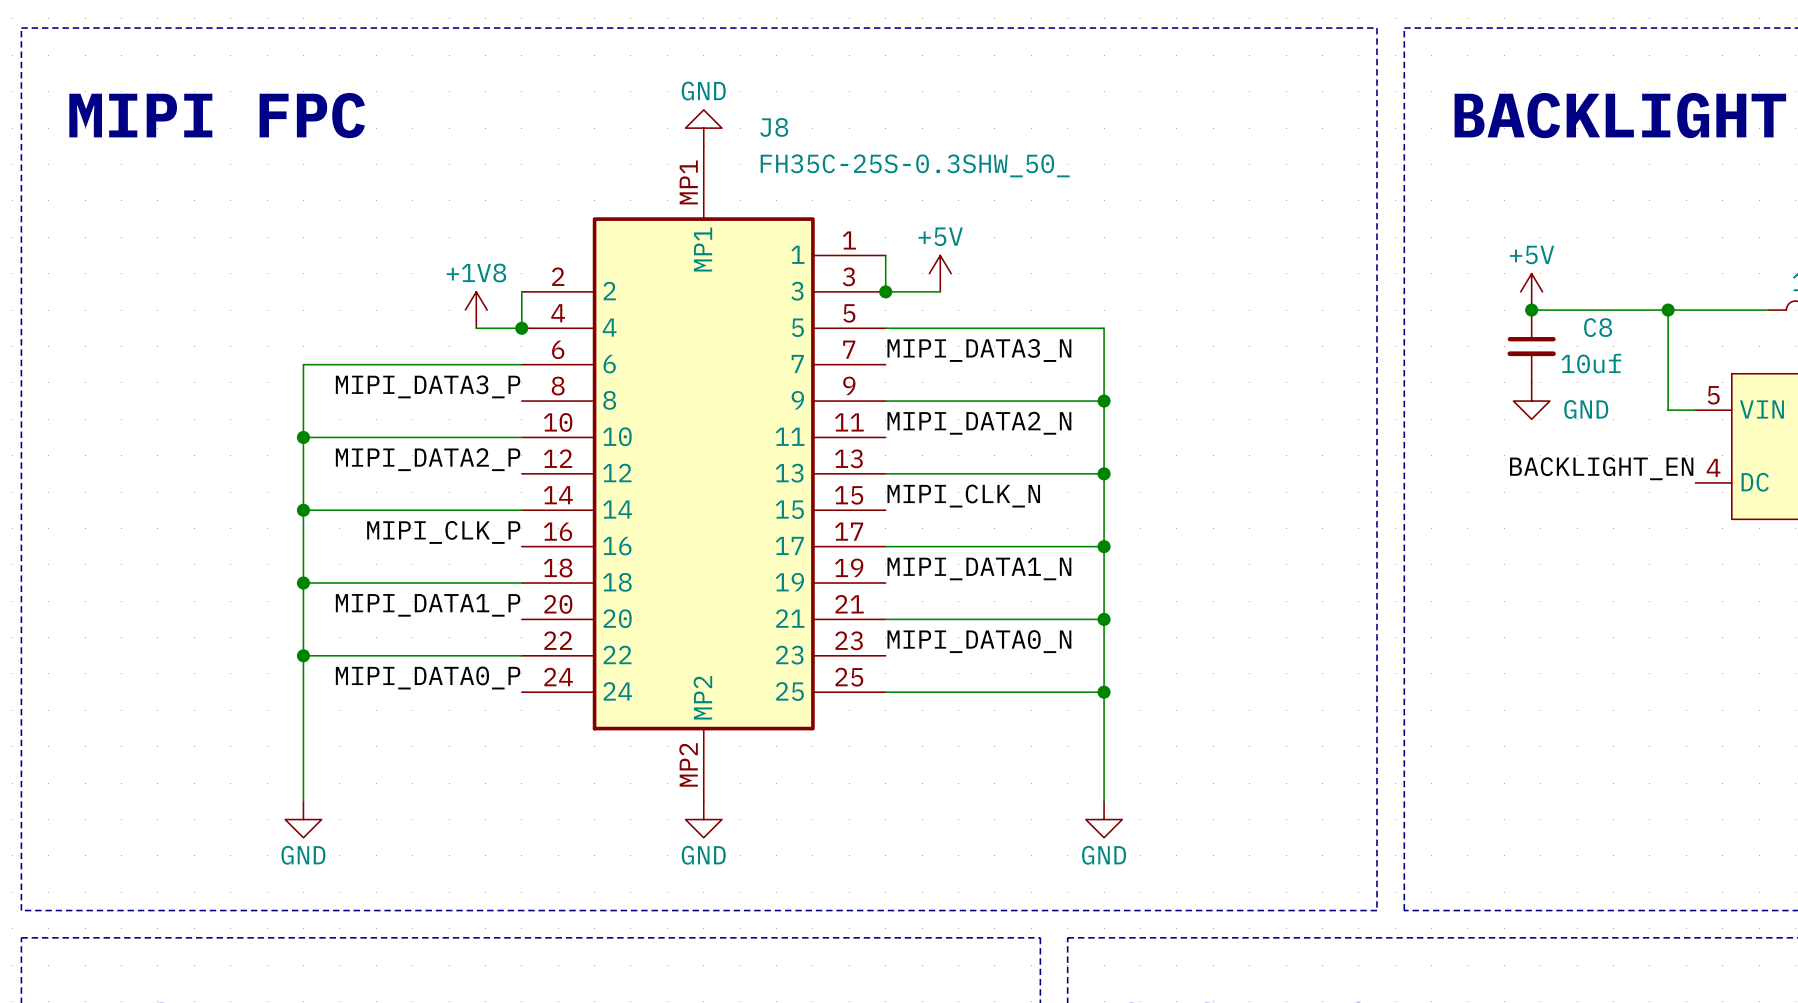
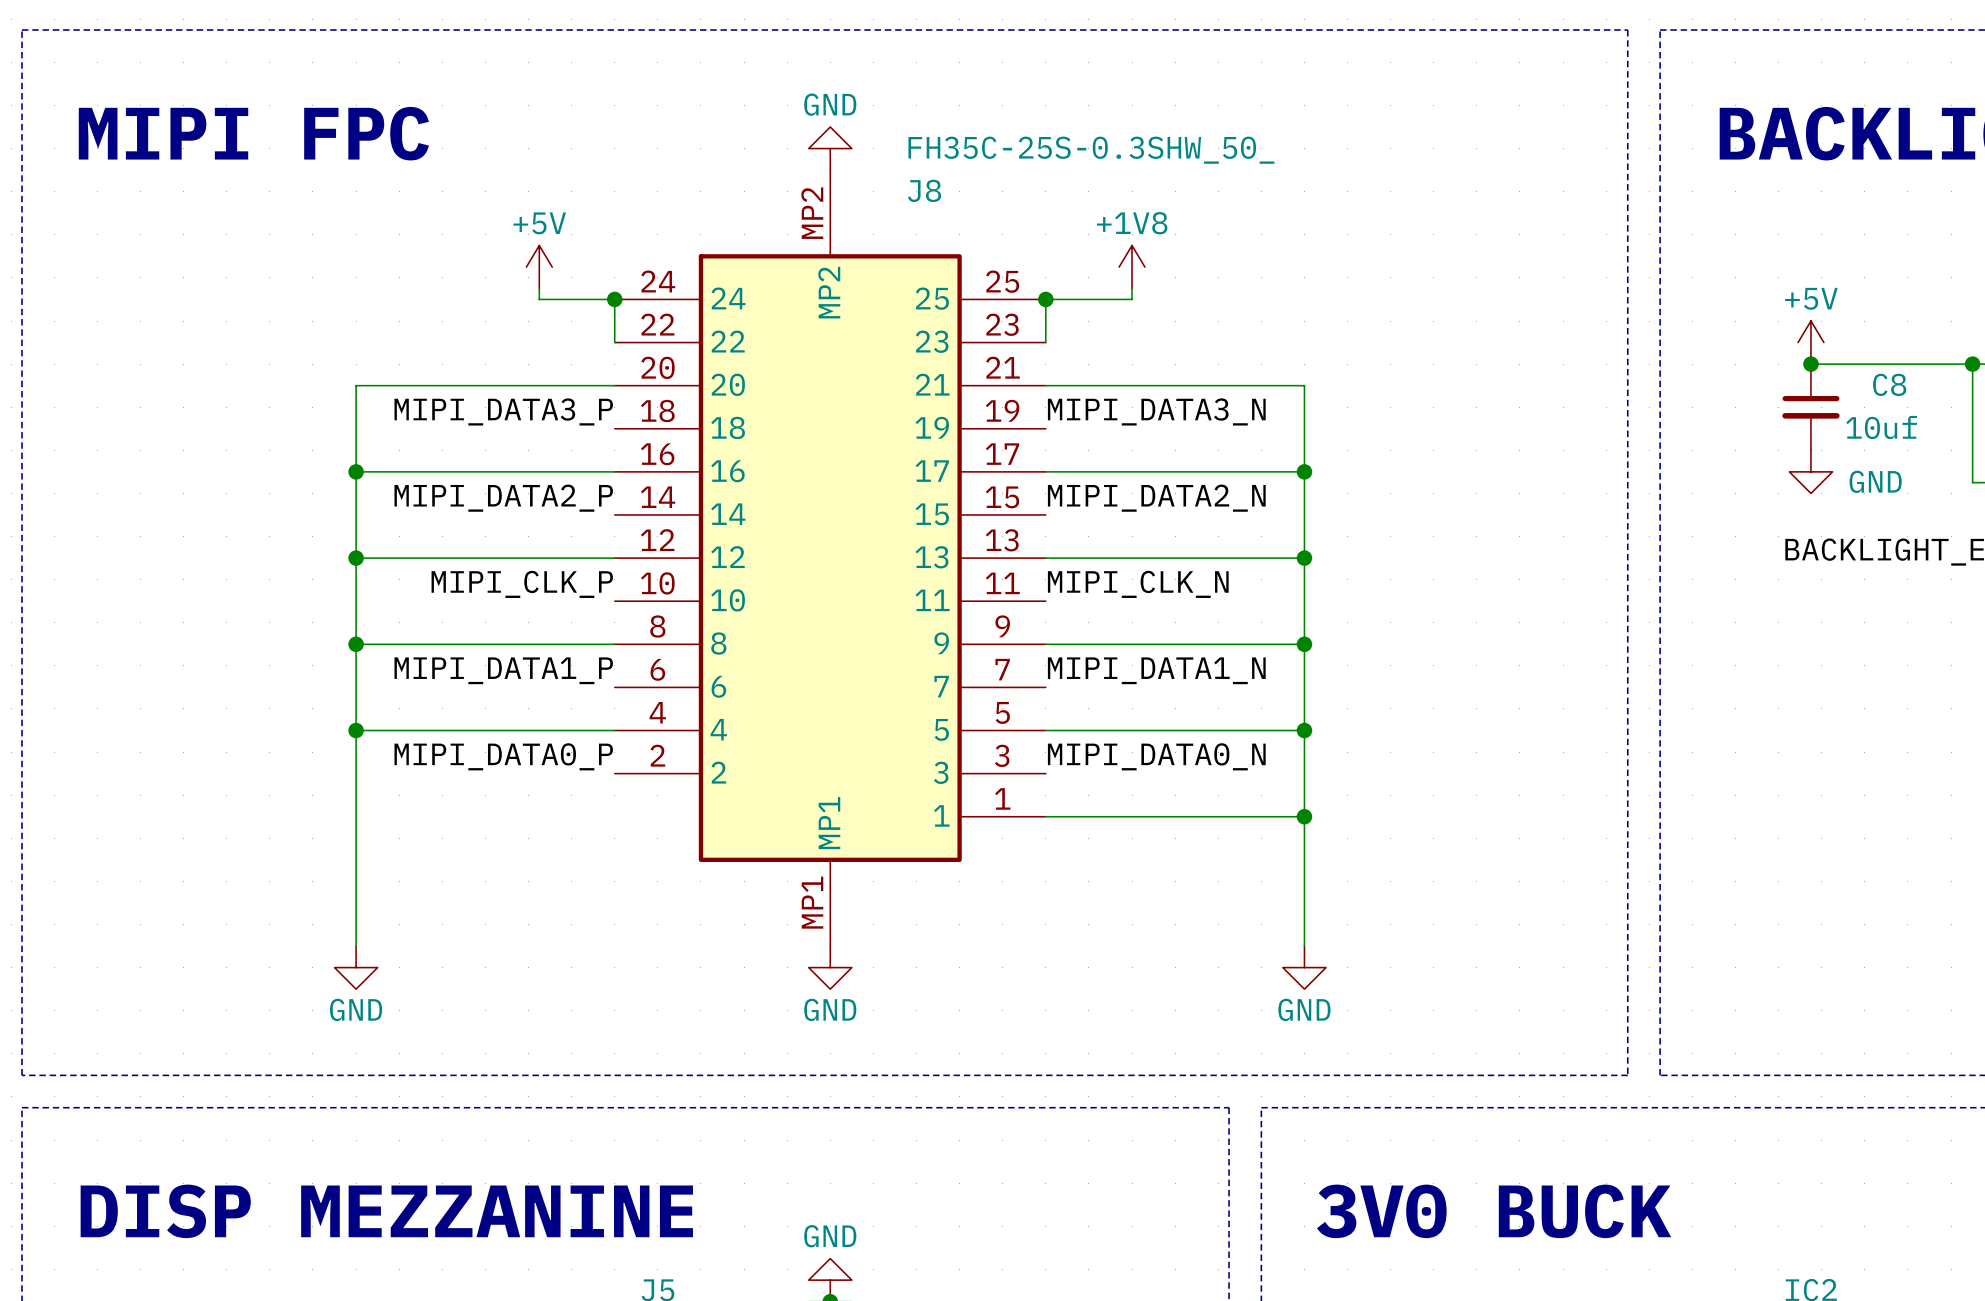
J8 name position: J8 (774, 127) -> J8 (924, 190)
J8 value position: FH35C-25S-0.3SHW_50_ (915, 165) -> FH35C-25S-0.3SHW_50_ (1091, 150)
power symbol: none -> +5V (539, 267)
power symbol: none -> +1V8 (1132, 267)
wire: none -> (1132, 288) (1132, 299) (1045, 299)
power symbol: +5V (940, 273) -> none
wire: (521, 291) (521, 328) -> (614, 342) (614, 299) (539, 299) (539, 288)
wire: (885, 291) (940, 291) -> none
junction position: (885, 291) -> (1045, 299)
power symbol: +1V8 (476, 310) -> none
junction position: (521, 328) -> (614, 299)
wire: (303, 364) (521, 364) -> (356, 428) (356, 385) (560, 385)
label position: MIPI_DATA3_P (428, 386) -> MIPI_DATA3_P (503, 411)
junction: none -> (356, 471)
wire: (303, 437) (521, 437) -> (356, 471) (614, 471)
junction: (303, 437) -> none
label position: MIPI_DATA2_P (428, 459) -> MIPI_DATA2_P (503, 498)
junction: none -> (356, 558)
J8 flip: as is (703, 473) -> up-down (830, 558)
wire: (303, 510) (521, 510) -> (356, 558) (614, 558)
junction: (303, 510) -> none
label position: MIPI_CLK_P (443, 532) -> MIPI_CLK_P (522, 584)
junction: none -> (356, 644)
wire: (303, 583) (521, 583) -> (356, 644) (614, 644)
junction: (303, 583) -> none
label position: MIPI_DATA1_P (428, 605) -> MIPI_DATA1_P (503, 670)
junction: none -> (356, 730)
wire: (303, 655) (521, 655) -> (356, 730) (614, 730)
junction: (303, 655) -> none
label position: MIPI_DATA0_P (428, 678) -> MIPI_DATA0_P (503, 756)

